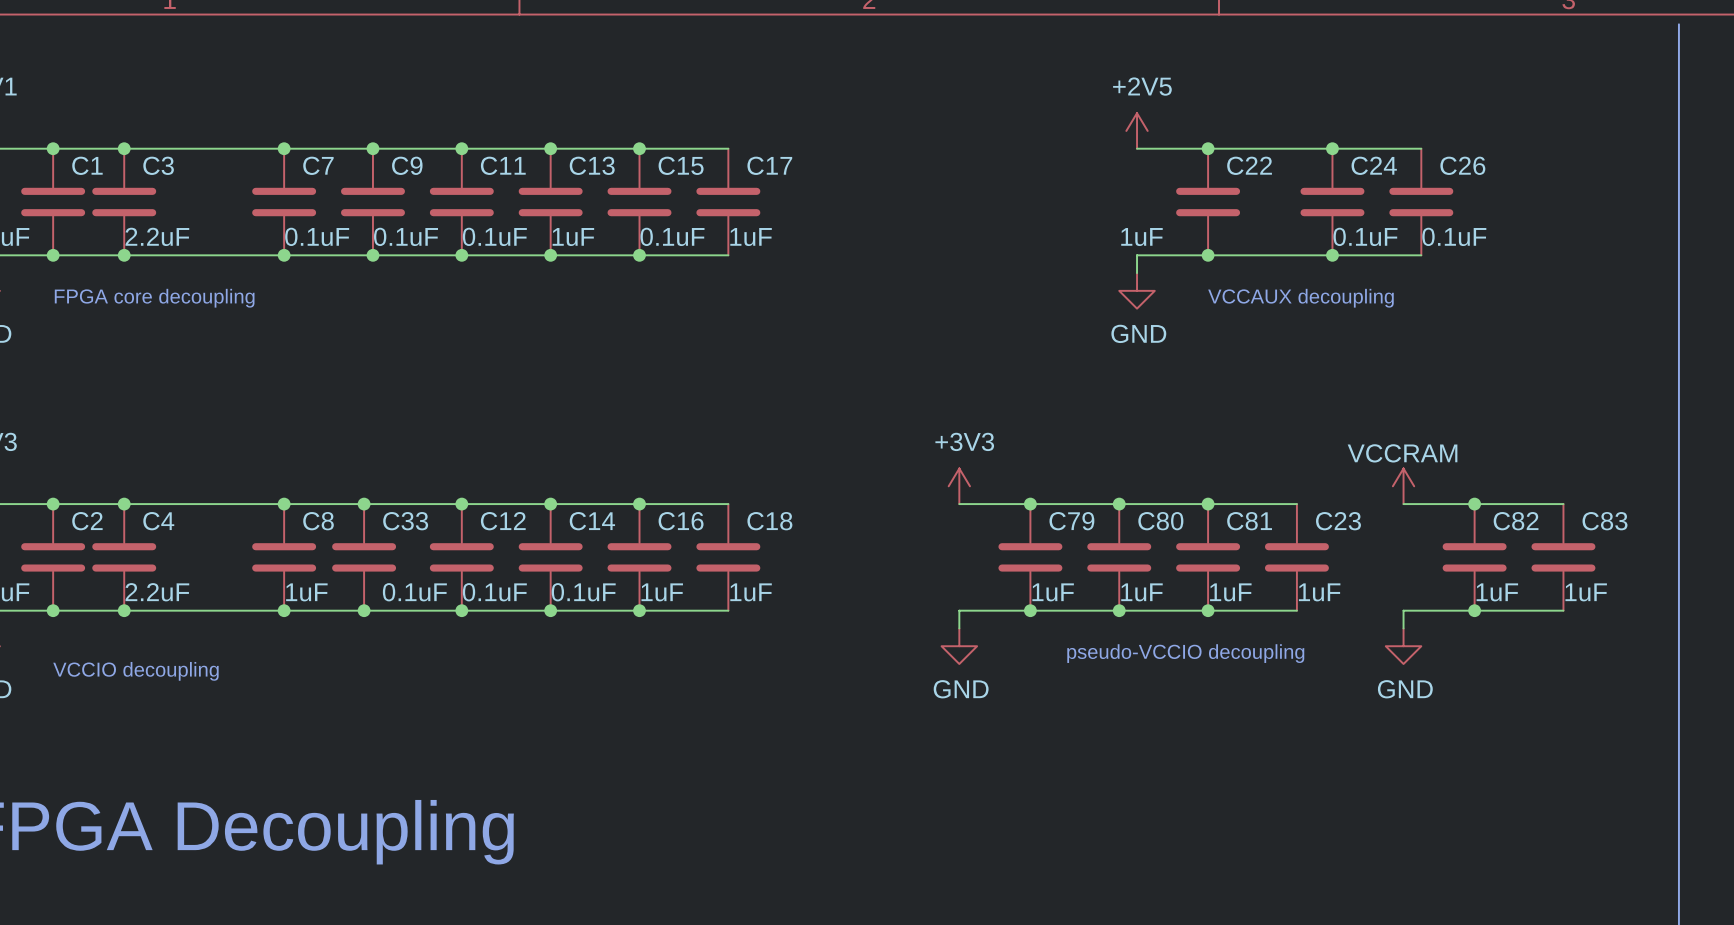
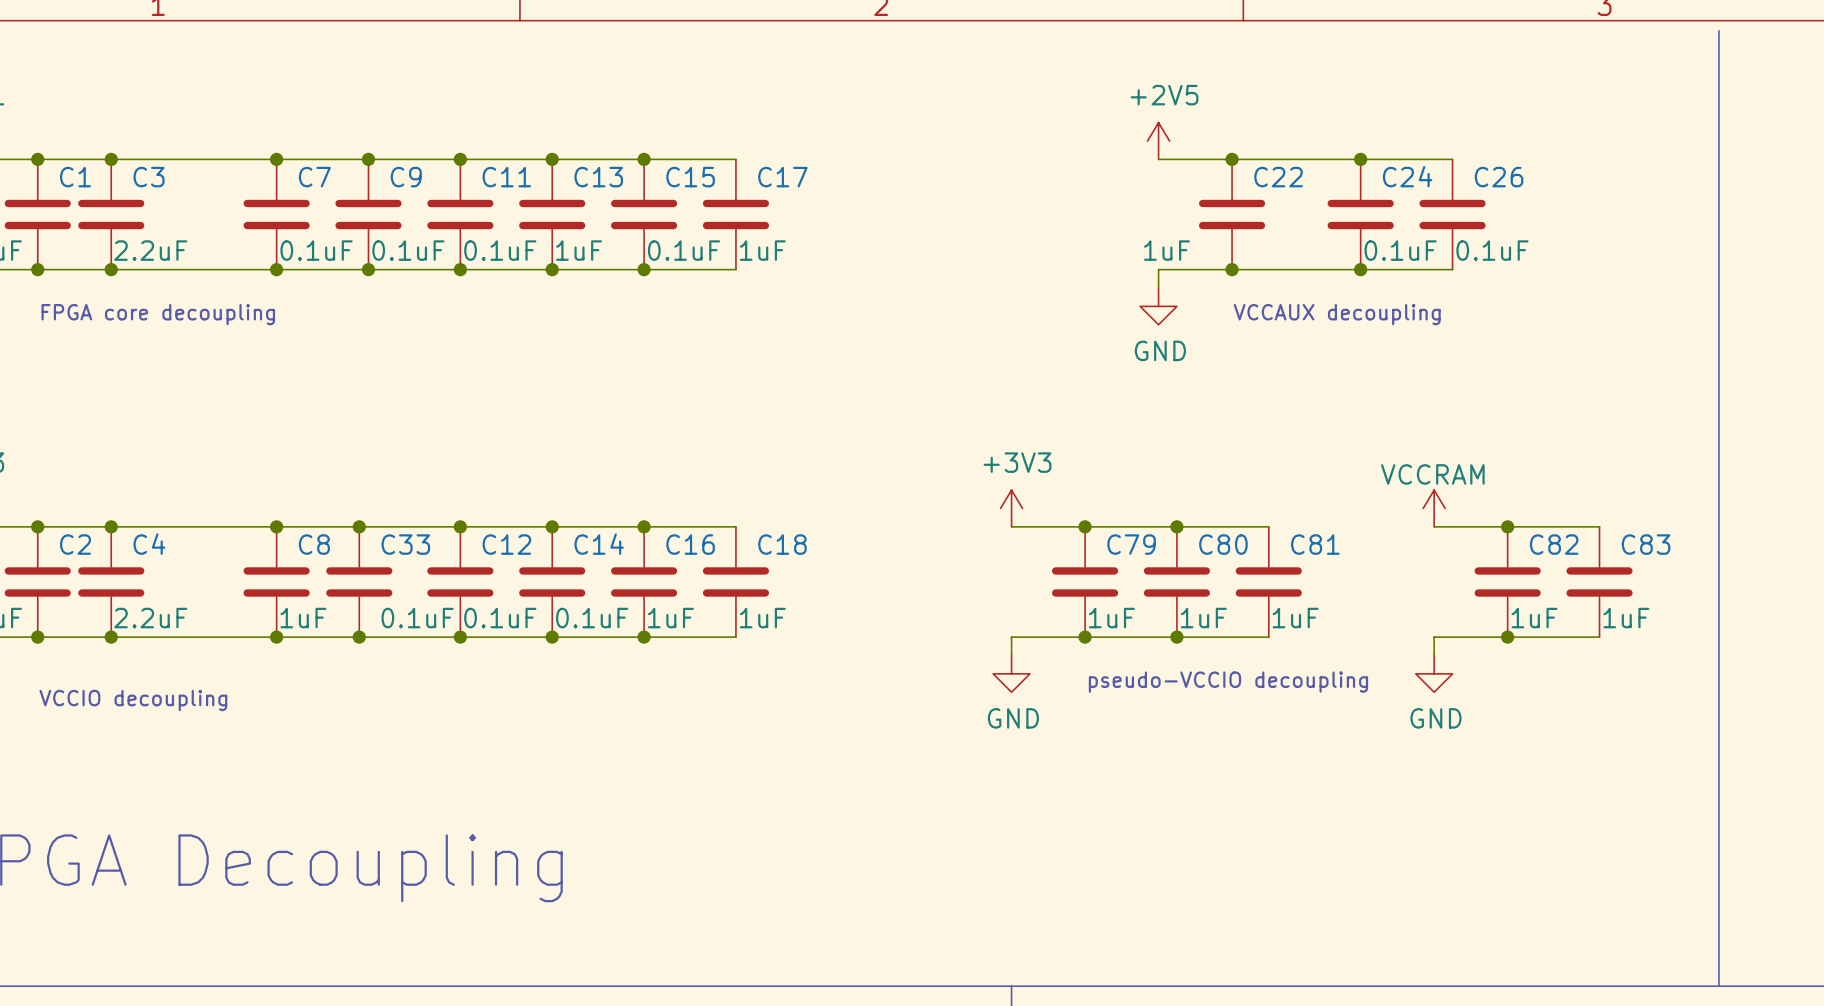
power symbol position: +3V3 (959, 486) -> +3V3 (1011, 508)
wire: (959, 504) (994, 504) -> none
junction: (1030, 504) -> none
junction: none -> (1085, 526)
junction: (1119, 504) -> none
junction: none -> (1176, 526)
junction: (1208, 504) -> none
wire: (1243, 504) (1296, 504) -> none
C79 position: (1030, 557) -> (1085, 581)
C80 position: (1119, 557) -> (1176, 581)
C81 position: (1208, 557) -> (1268, 581)
C23: 1uF (1296, 557) -> none
wire: (994, 610) (959, 610) (959, 628) -> (1011, 637) (1011, 655)
junction: (1030, 610) -> none
junction: none -> (1085, 637)
junction: (1119, 610) -> none
junction: none -> (1176, 637)
junction: (1208, 610) -> none
wire: (1243, 610) (1296, 610) -> none
power symbol position: GND (959, 646) -> GND (1011, 673)

